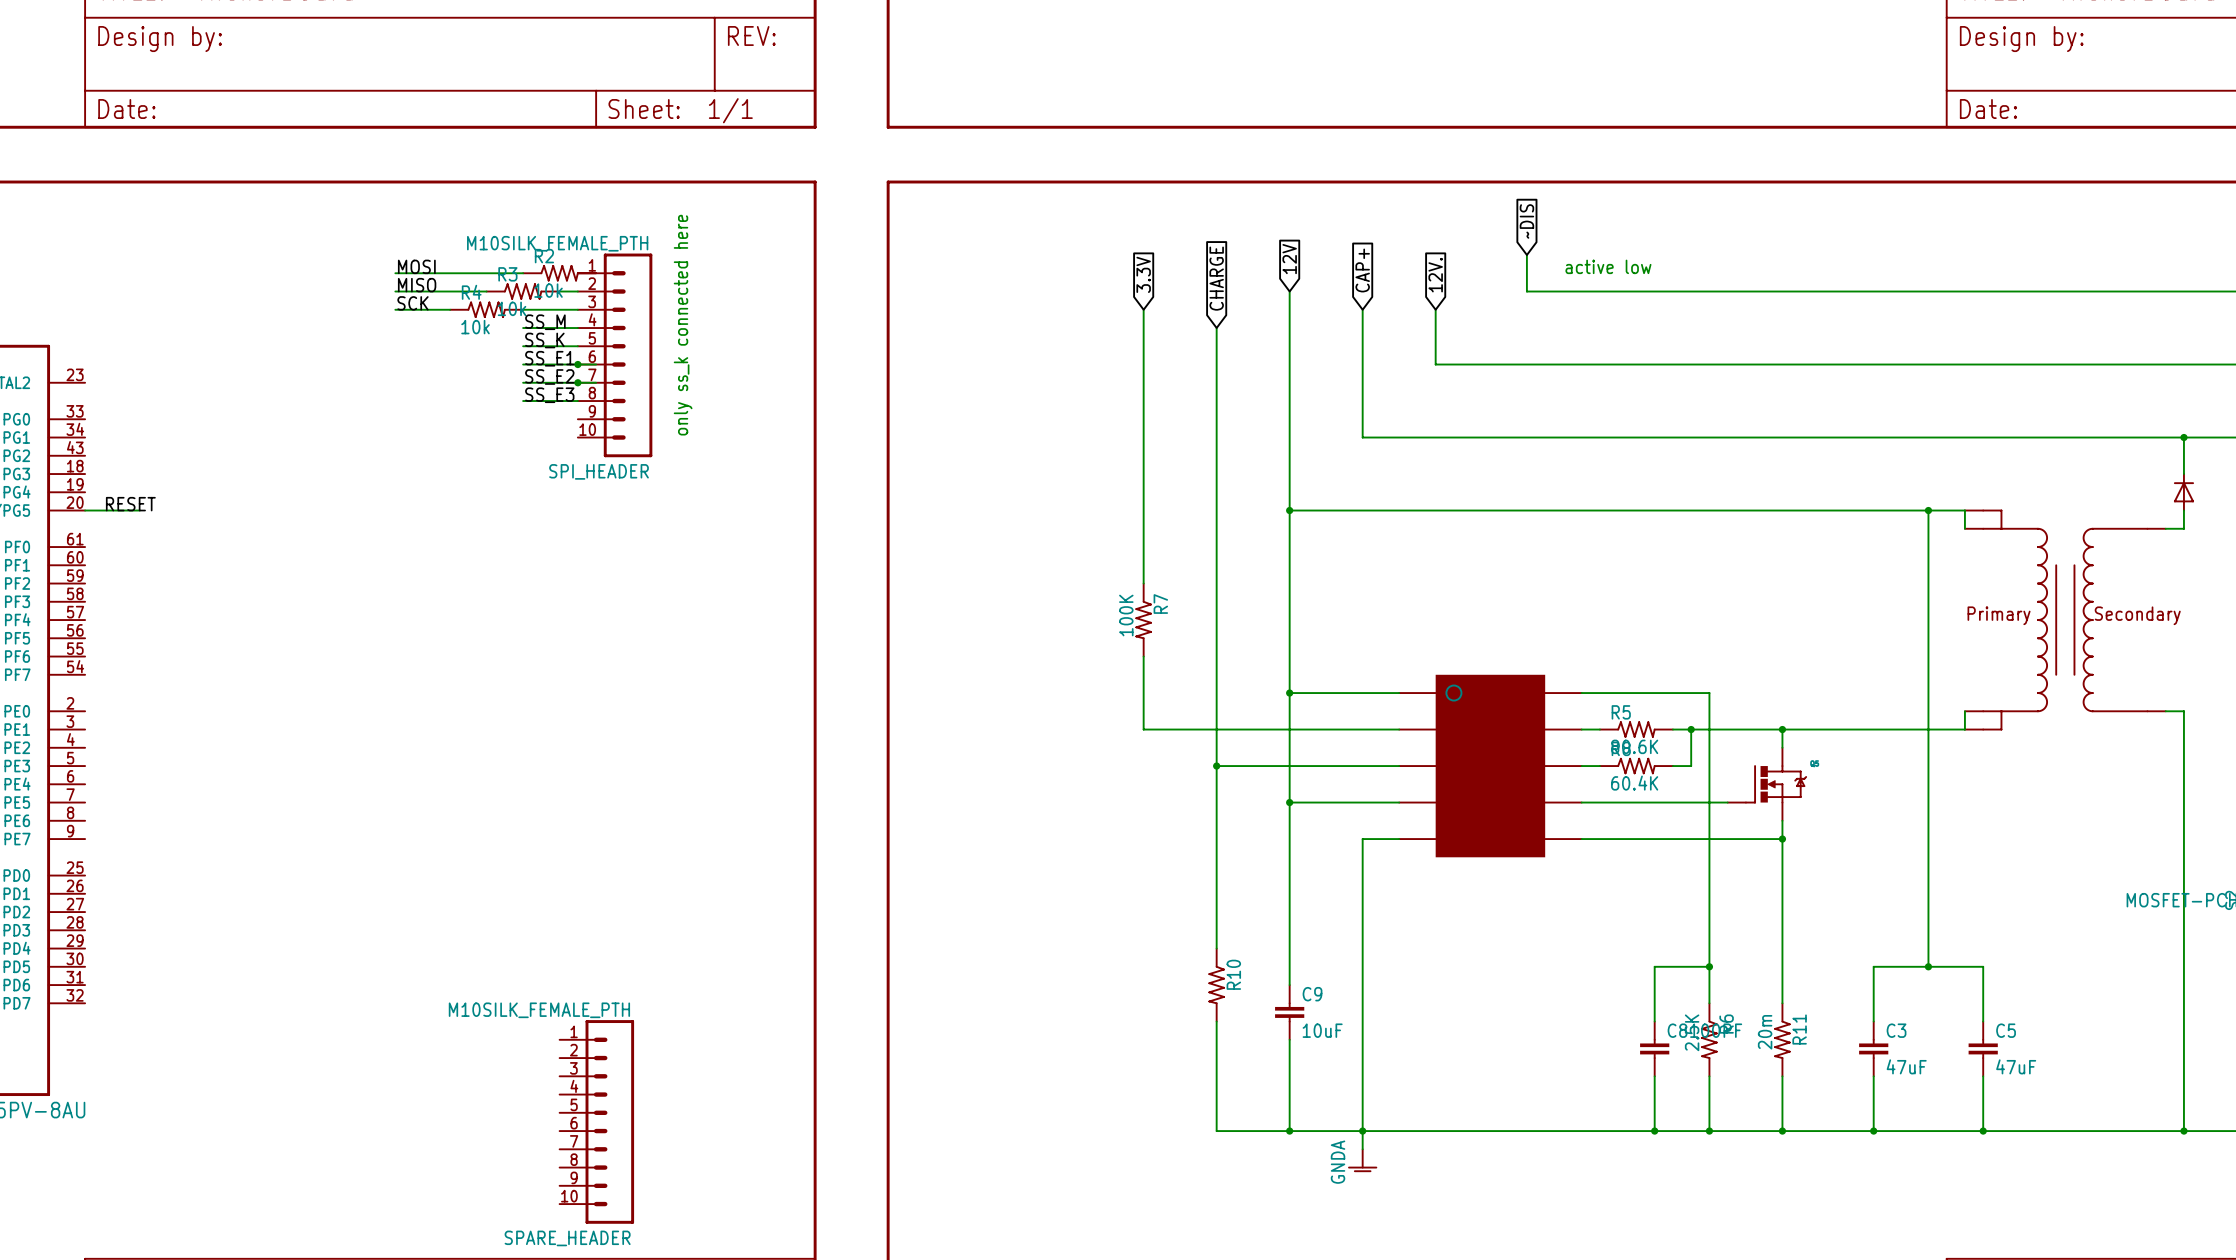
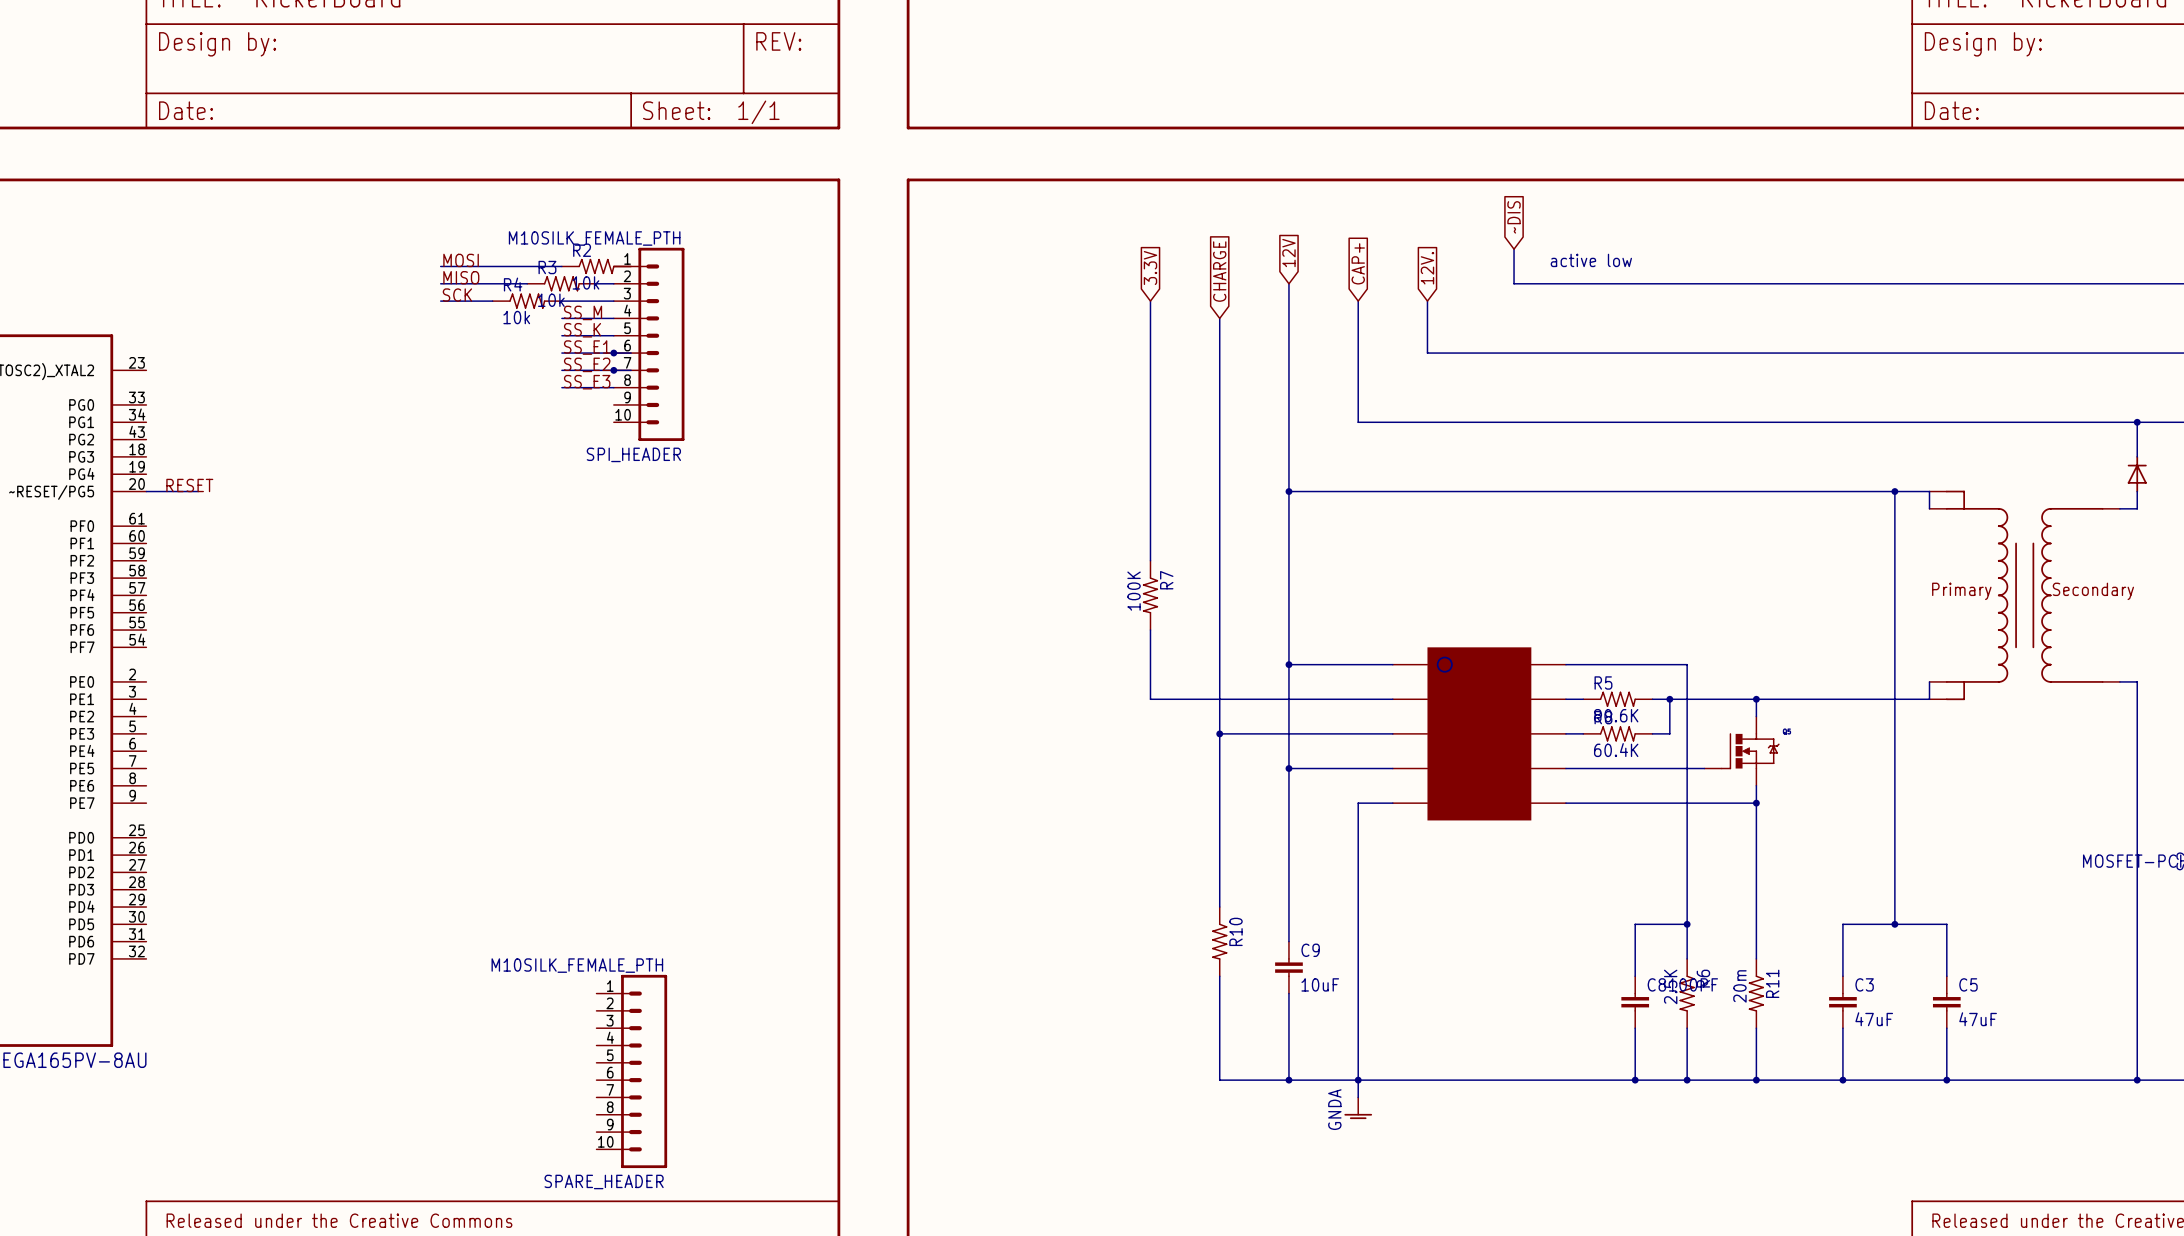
text: only ss_k connected here (683, 325) -> none

